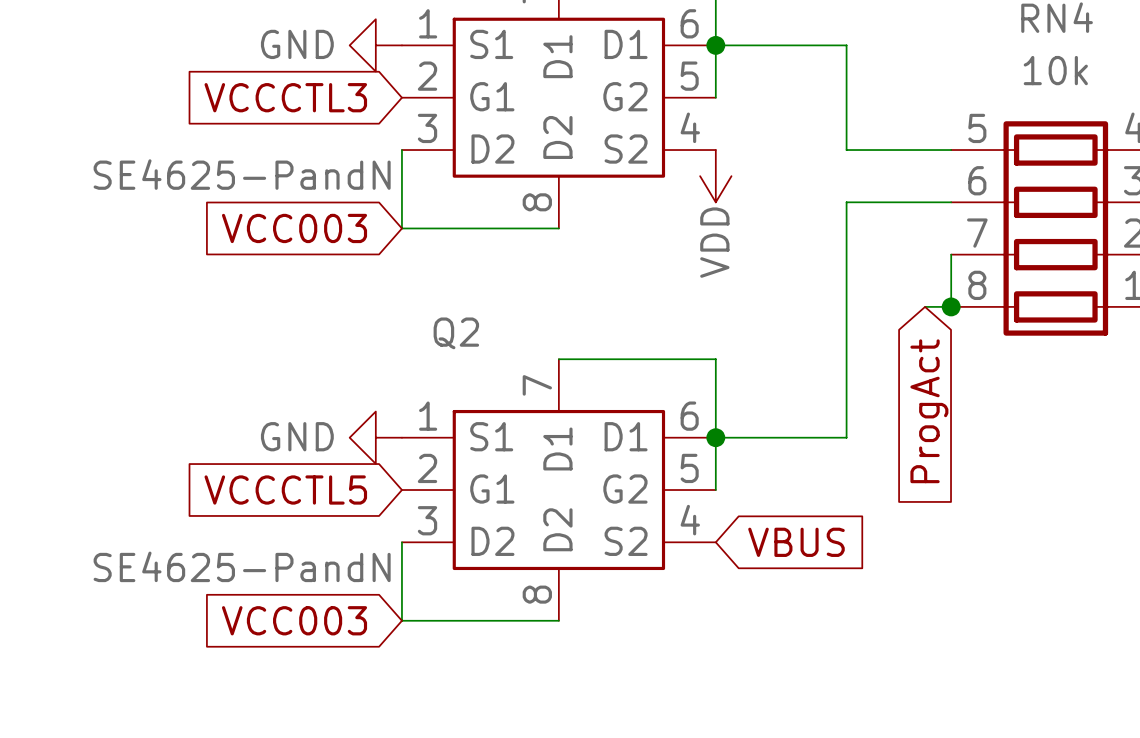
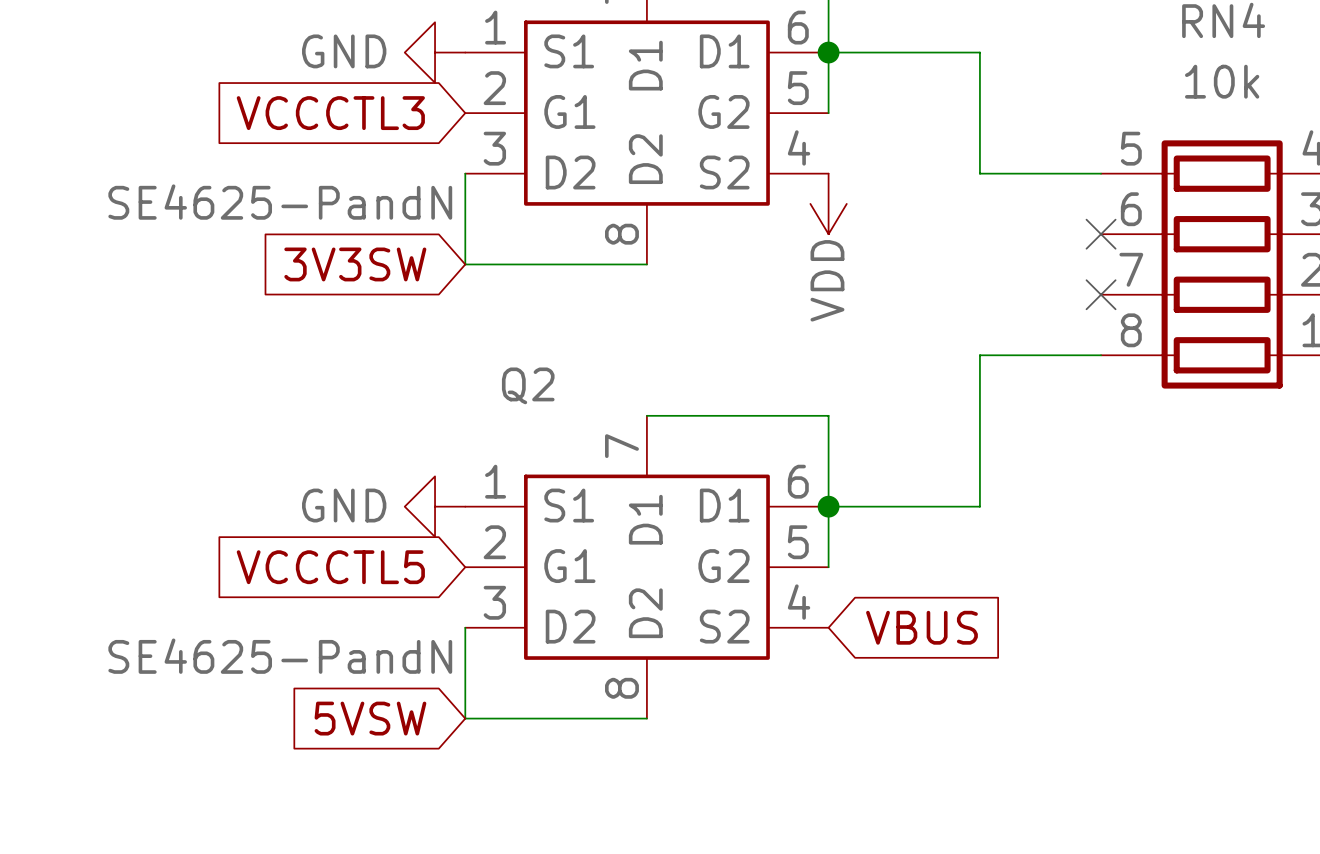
wire: (951, 202) (846, 202) (846, 306) -> (1070, 355) (979, 355)
no-connect mark: none -> (1101, 234)
global label: VCC003 (294, 228) -> 3V3SW (355, 264)
wire: (951, 254) (951, 306) -> none
no-connect mark: none -> (1101, 294)
junction: (951, 306) -> none
global label: ProgAct (929, 411) -> none
global label: VCC003 (294, 620) -> 5VSW (370, 718)

